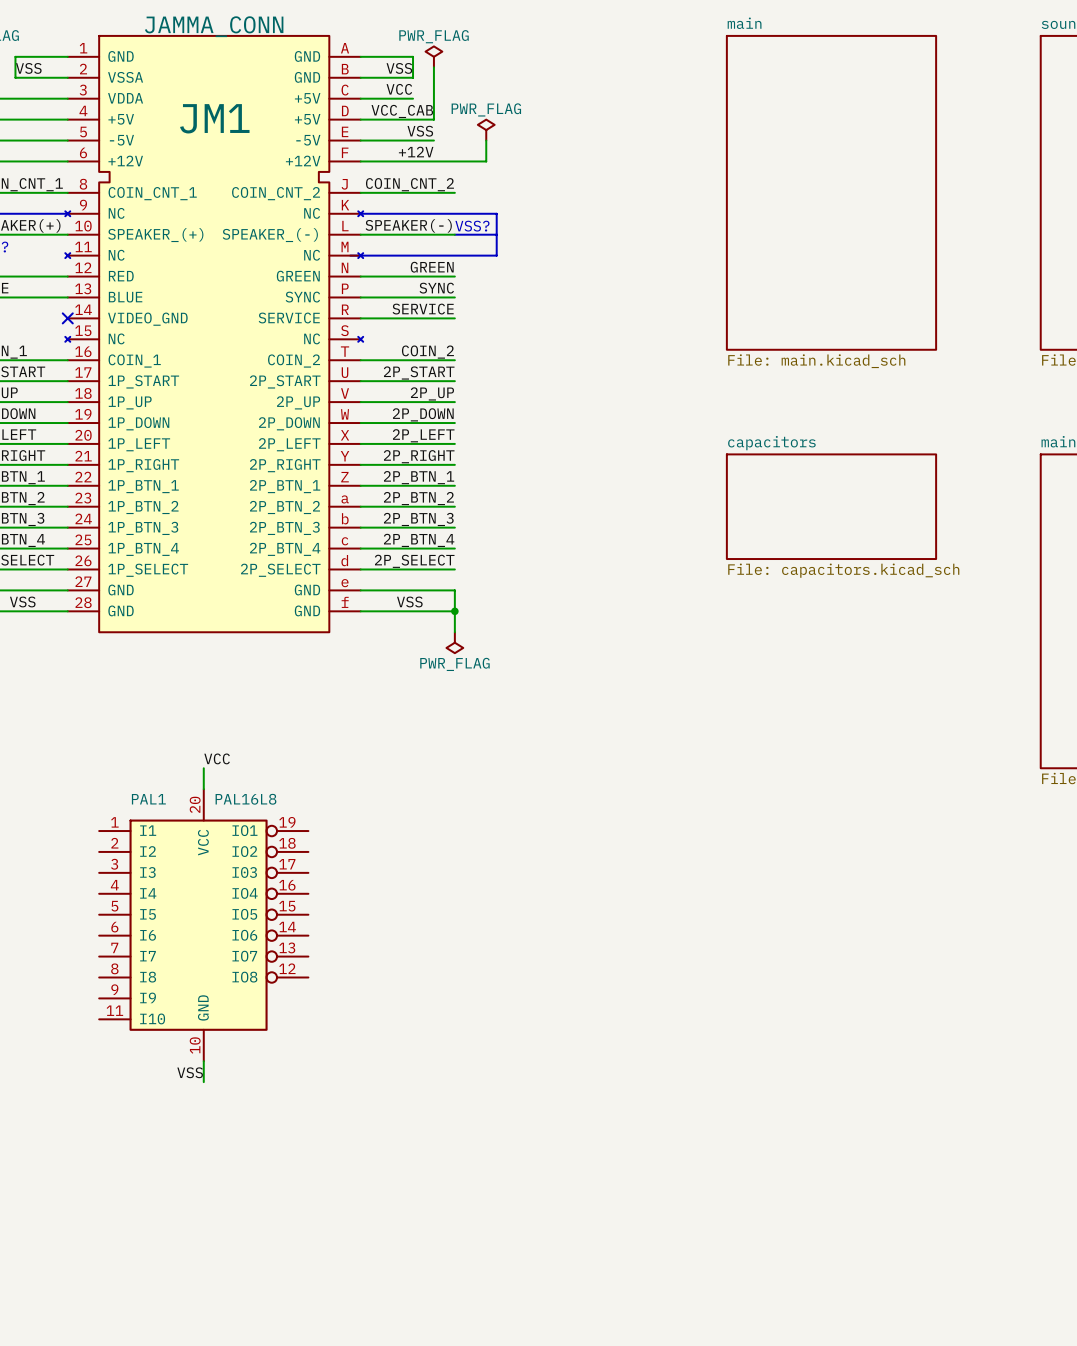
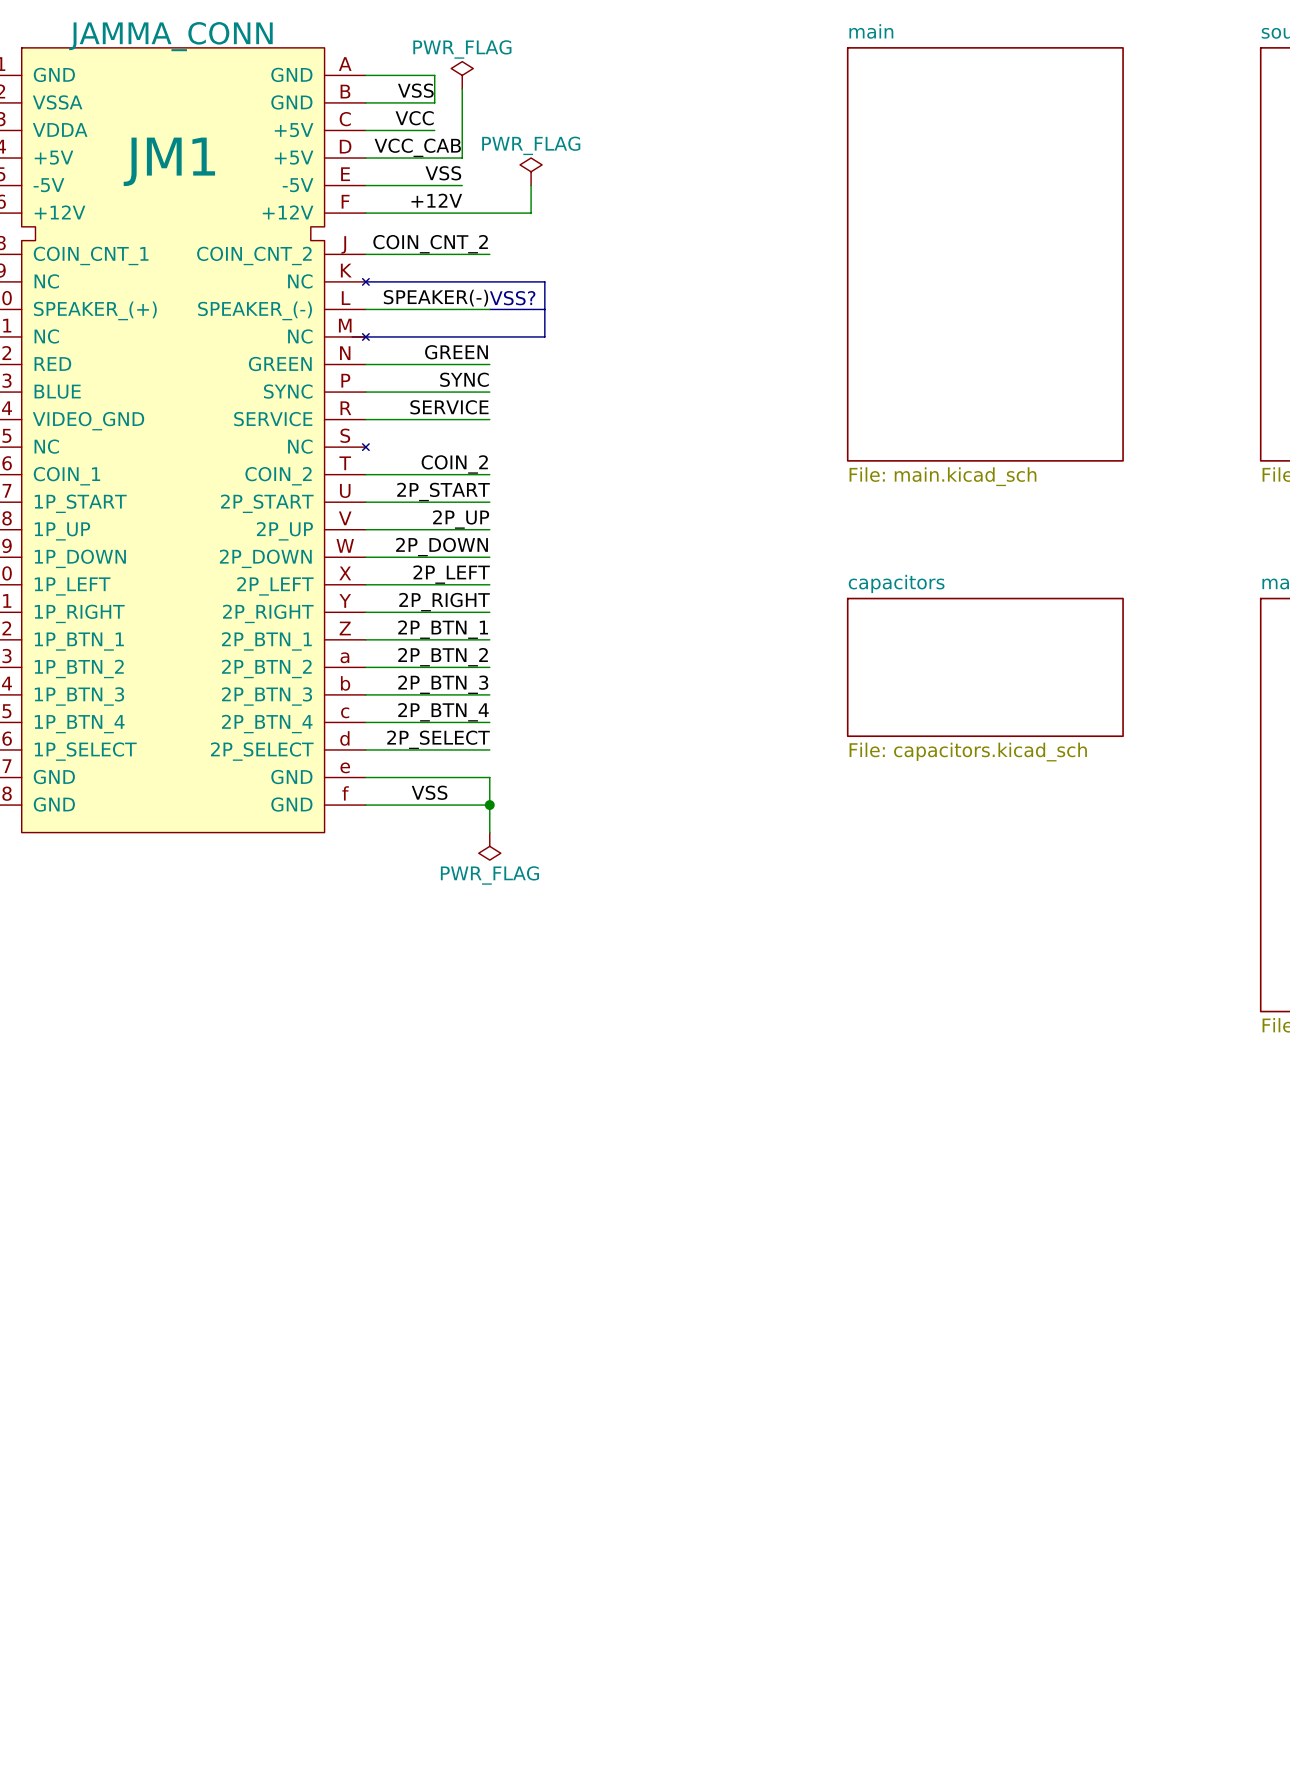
label: VCC (217, 758) -> none
wire: (203, 768) (203, 789) -> none
PAL1: PAL16L8 (203, 925) -> none
wire: (203, 1061) (203, 1082) -> none
label: VSS (190, 1072) -> none

